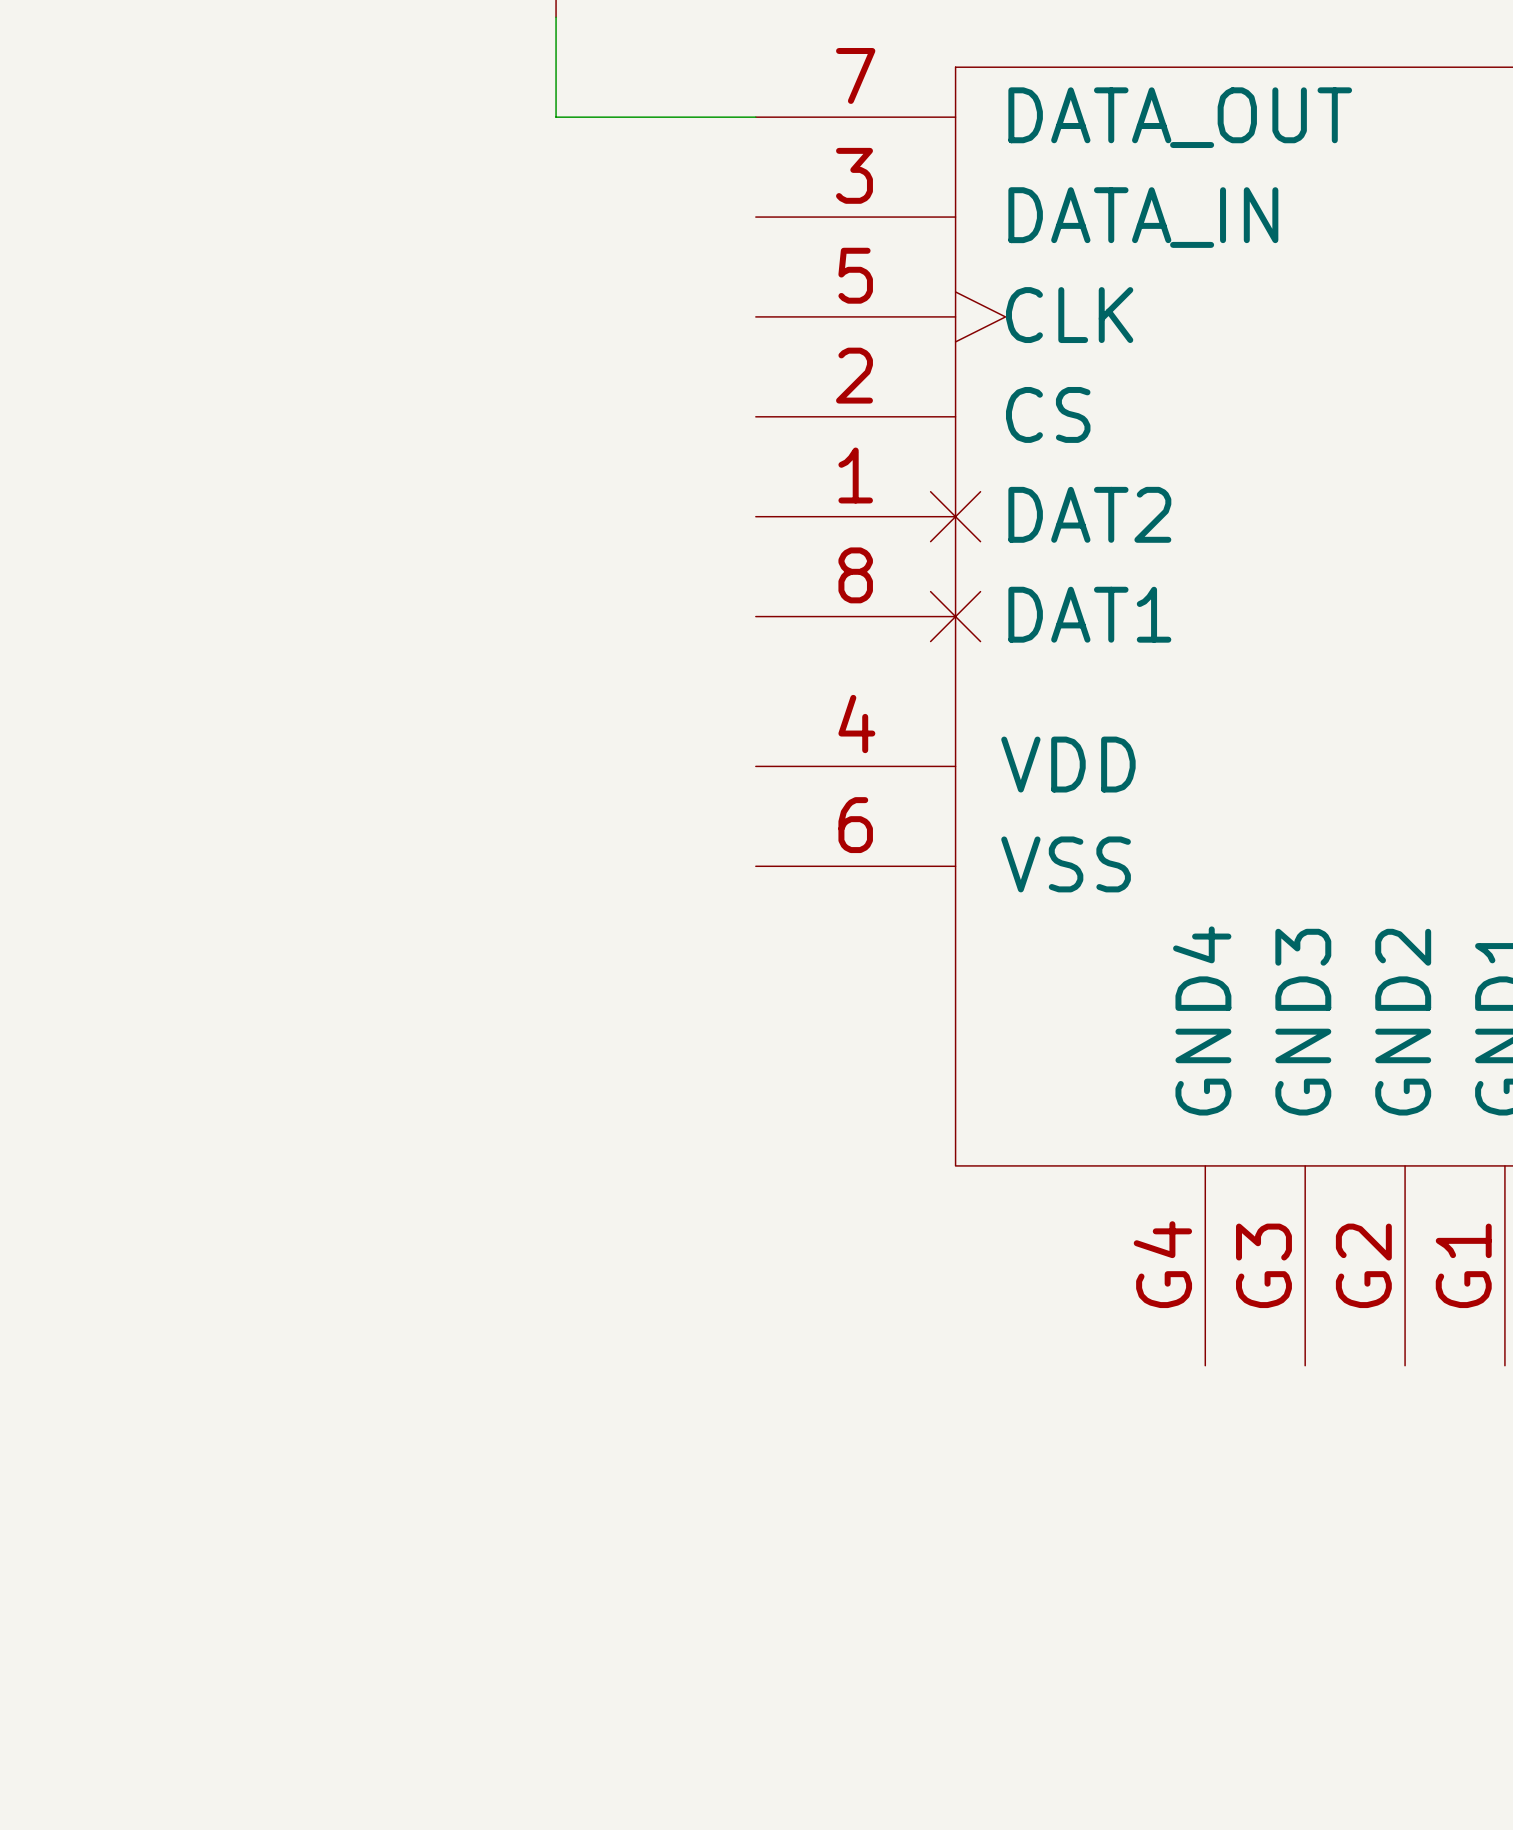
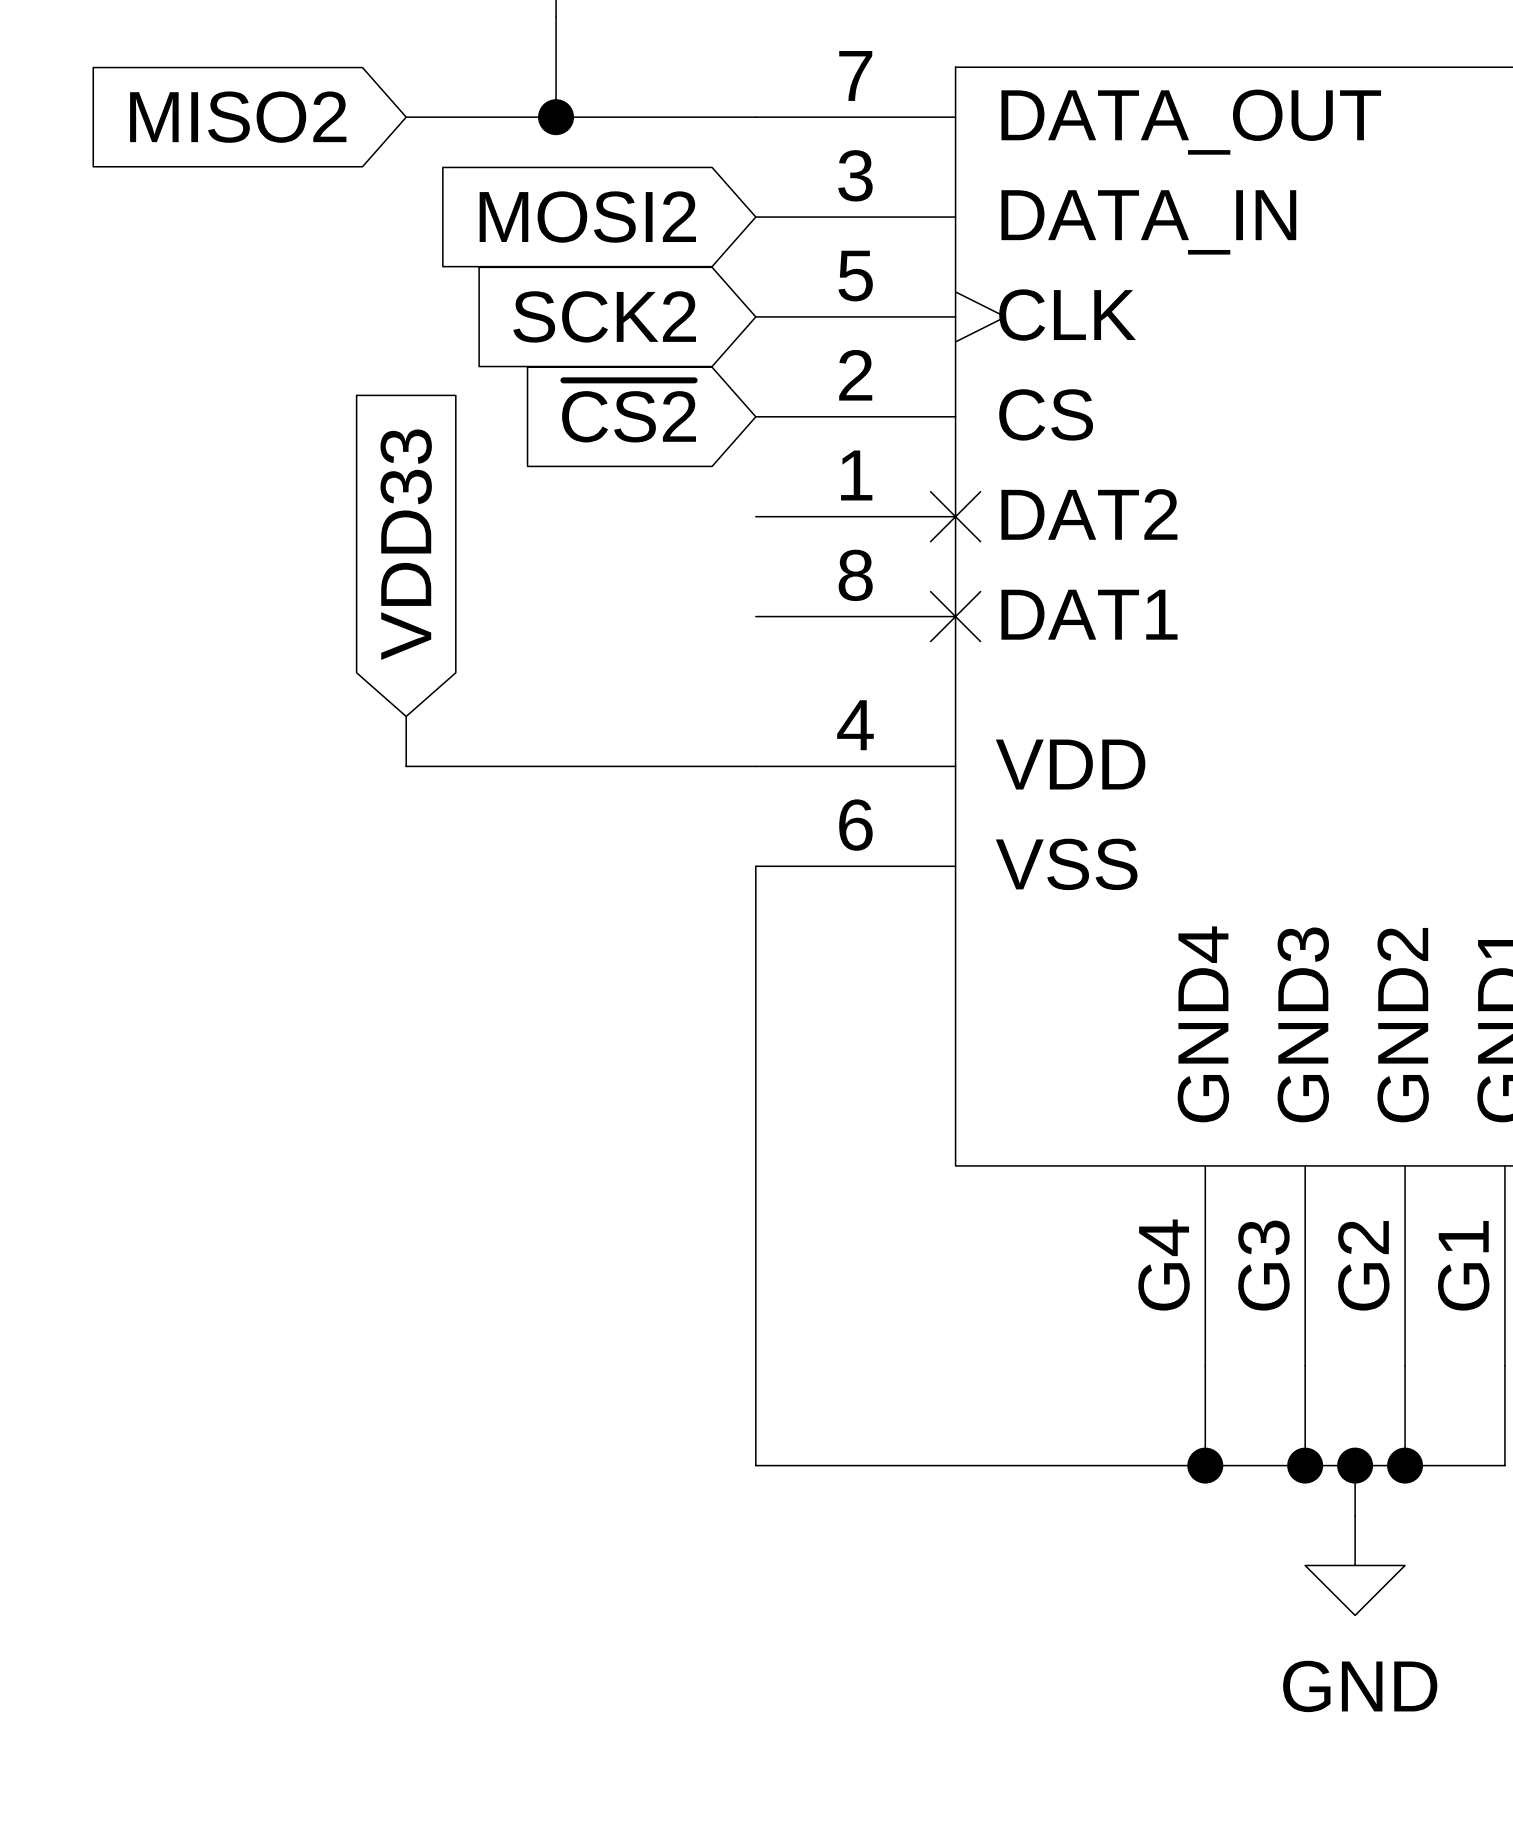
global label: none -> MISO2 (238, 117)
wire: none -> (406, 117) (556, 117)
junction: none -> (556, 117)
global label: none -> MOSI2 (587, 217)
global label: none -> SCK2 (604, 316)
global label: none -> ~{CS2} (629, 411)
global label: none -> VDD33 (406, 544)
wire: none -> (406, 716) (406, 766) (755, 766)
wire: none -> (755, 866) (755, 1465) (1504, 1465) (1504, 1365)
wire: none -> (1205, 1365) (1205, 1465)
wire: none -> (1305, 1365) (1305, 1465)
wire: none -> (1405, 1365) (1405, 1465)
junction: none -> (1205, 1465)
junction: none -> (1305, 1465)
wire: none -> (1355, 1465) (1355, 1515)
junction: none -> (1355, 1465)
junction: none -> (1405, 1465)
power symbol: none -> GND (1355, 1565)

